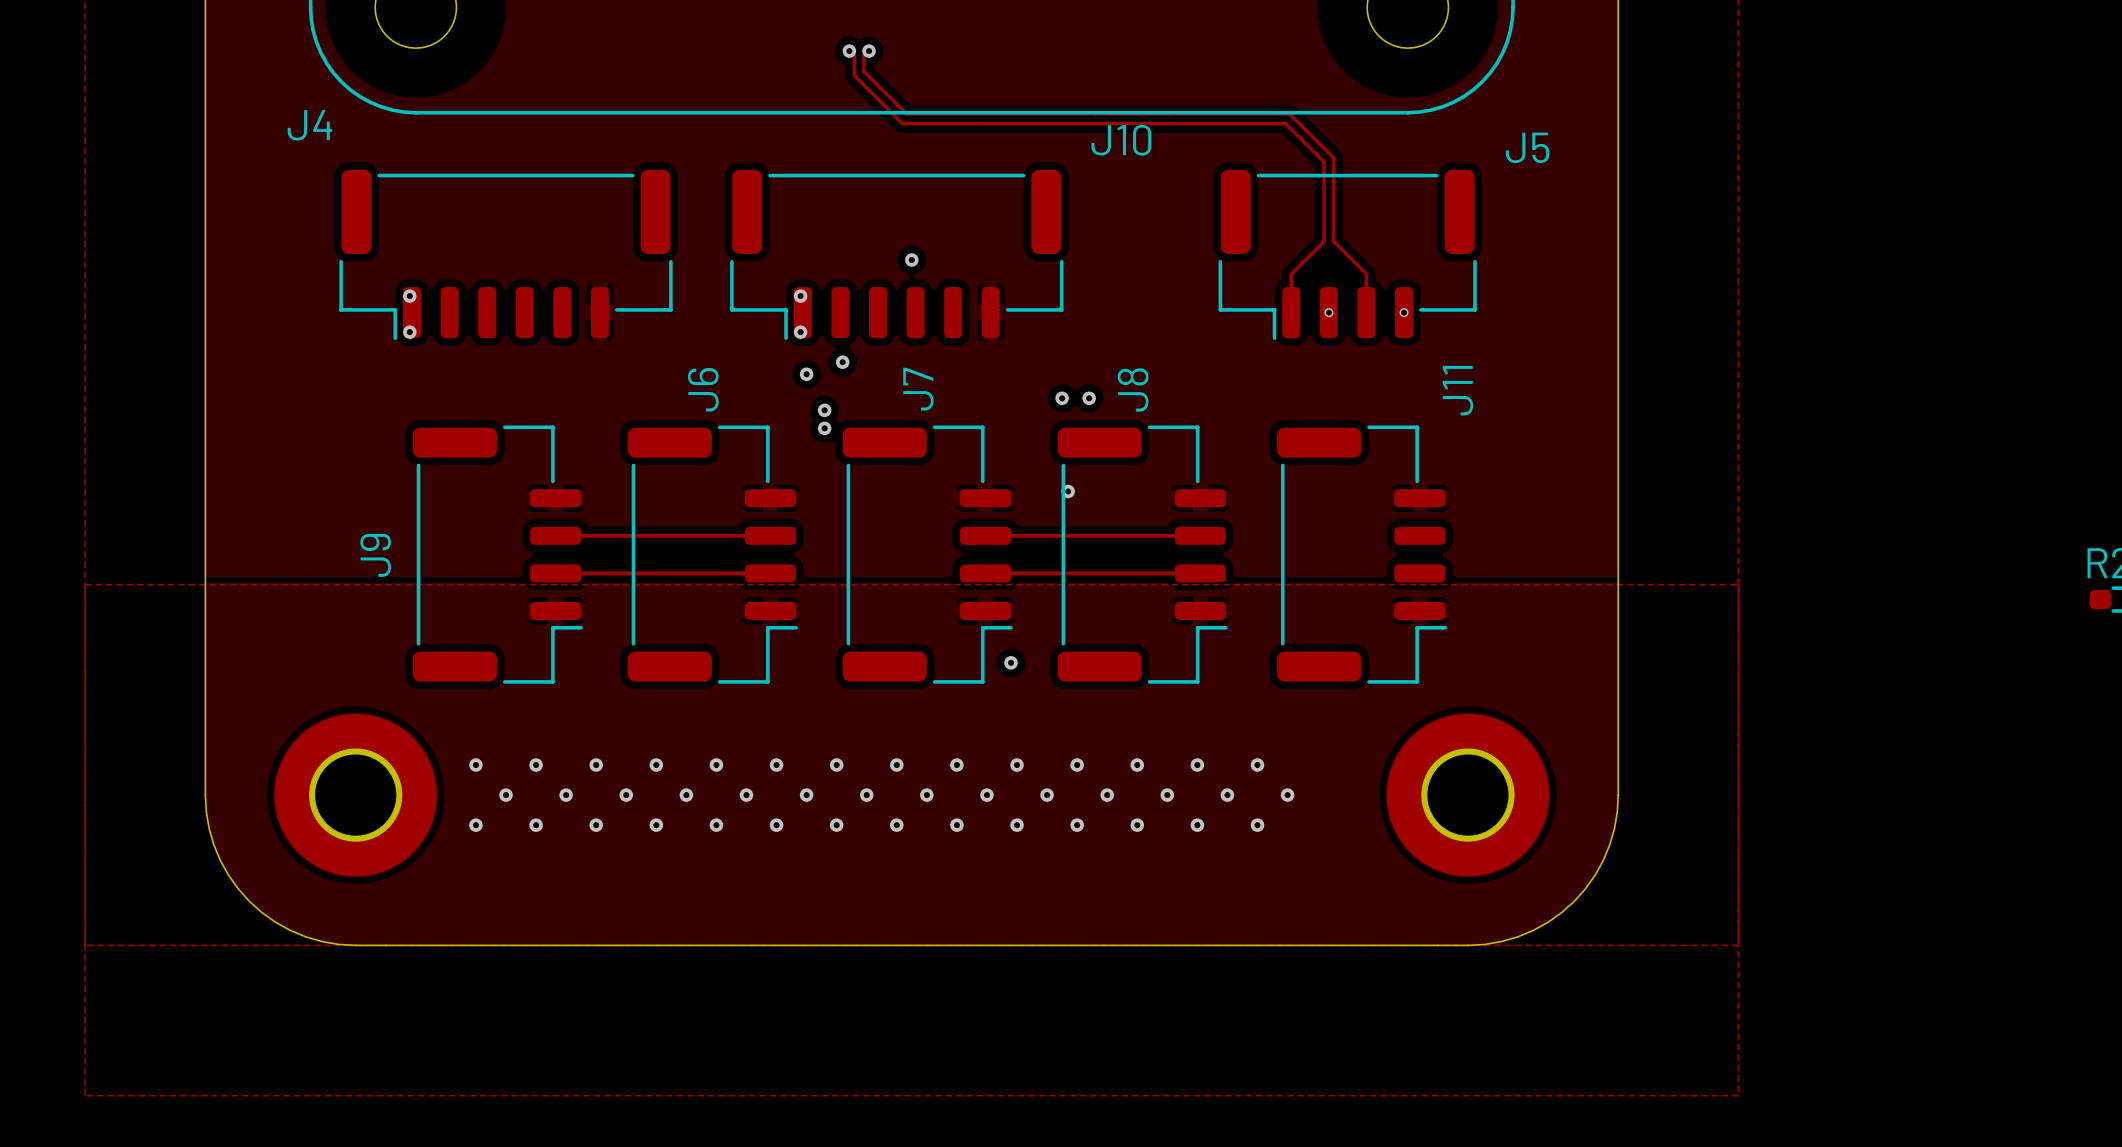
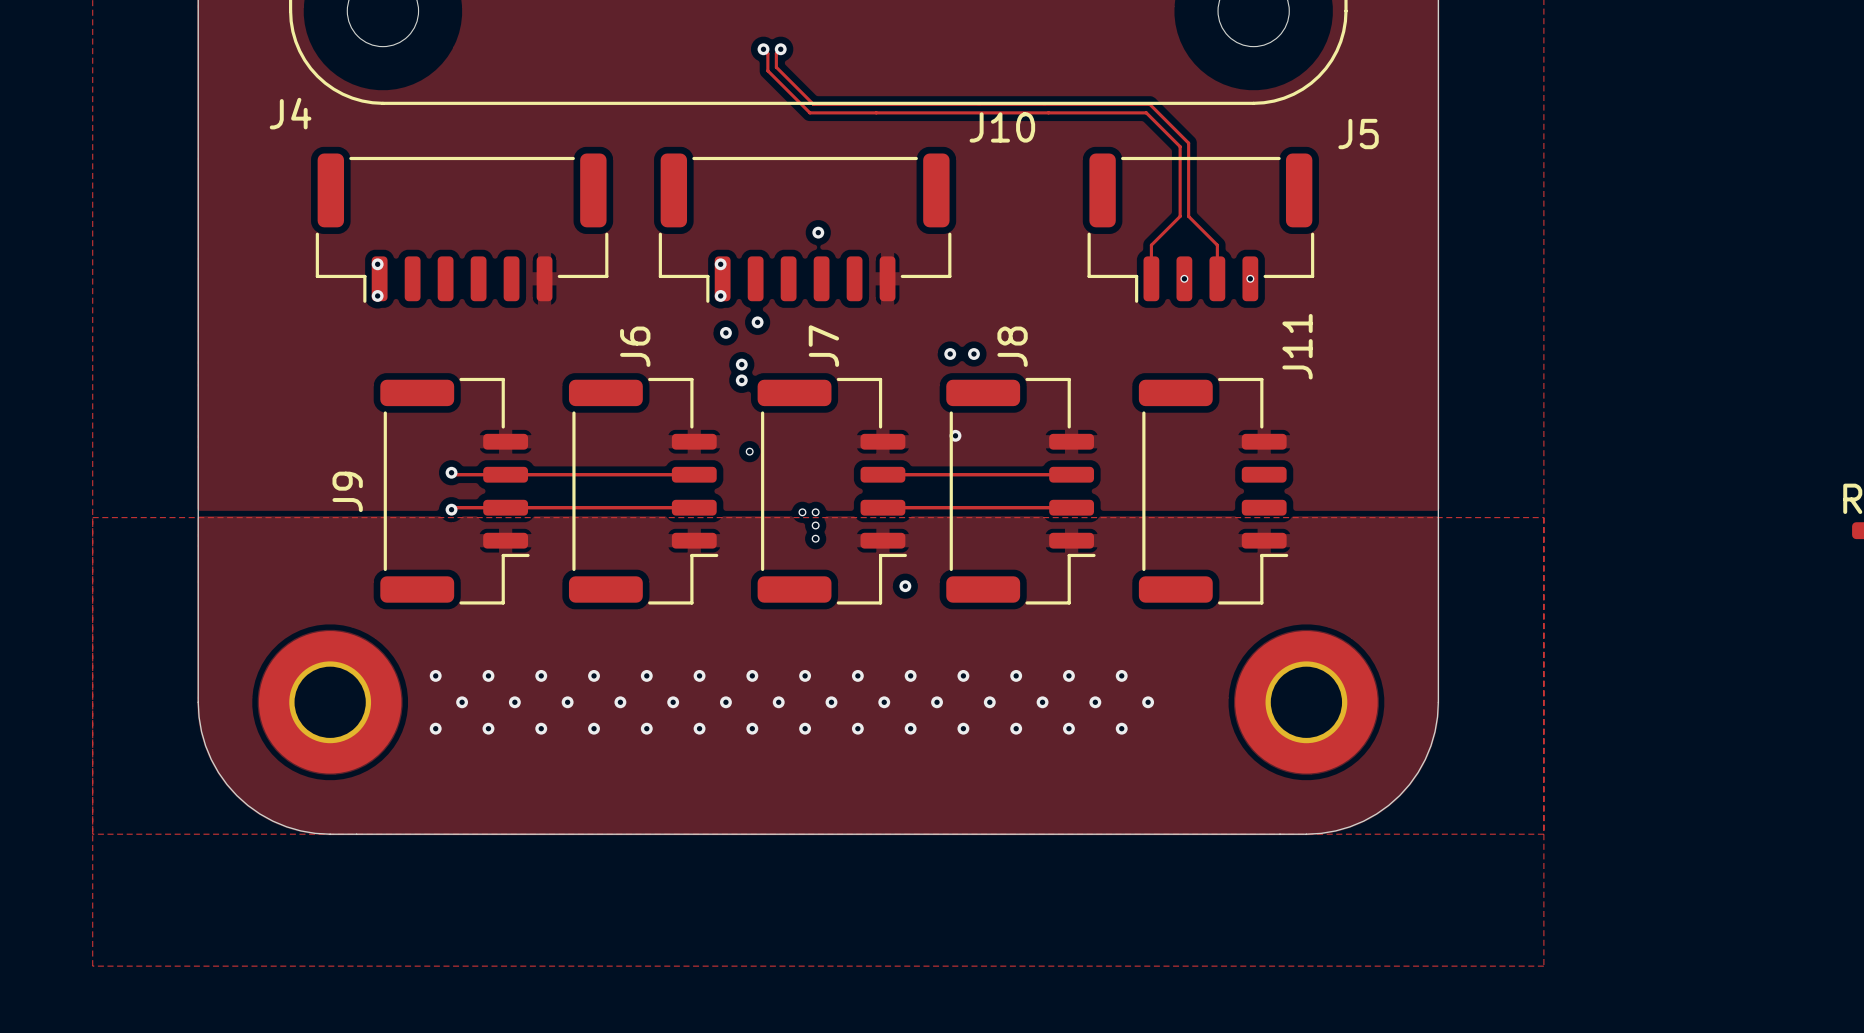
via: none -> (749, 451)
track: none -> (451, 472) (453, 474) (505, 474)
via: none -> (451, 472)
track: none -> (505, 507) (453, 507) (451, 509)
via: none -> (451, 509)
via: none -> (802, 512)
via: none -> (815, 512)
via: none -> (815, 525)
via: none -> (815, 538)

